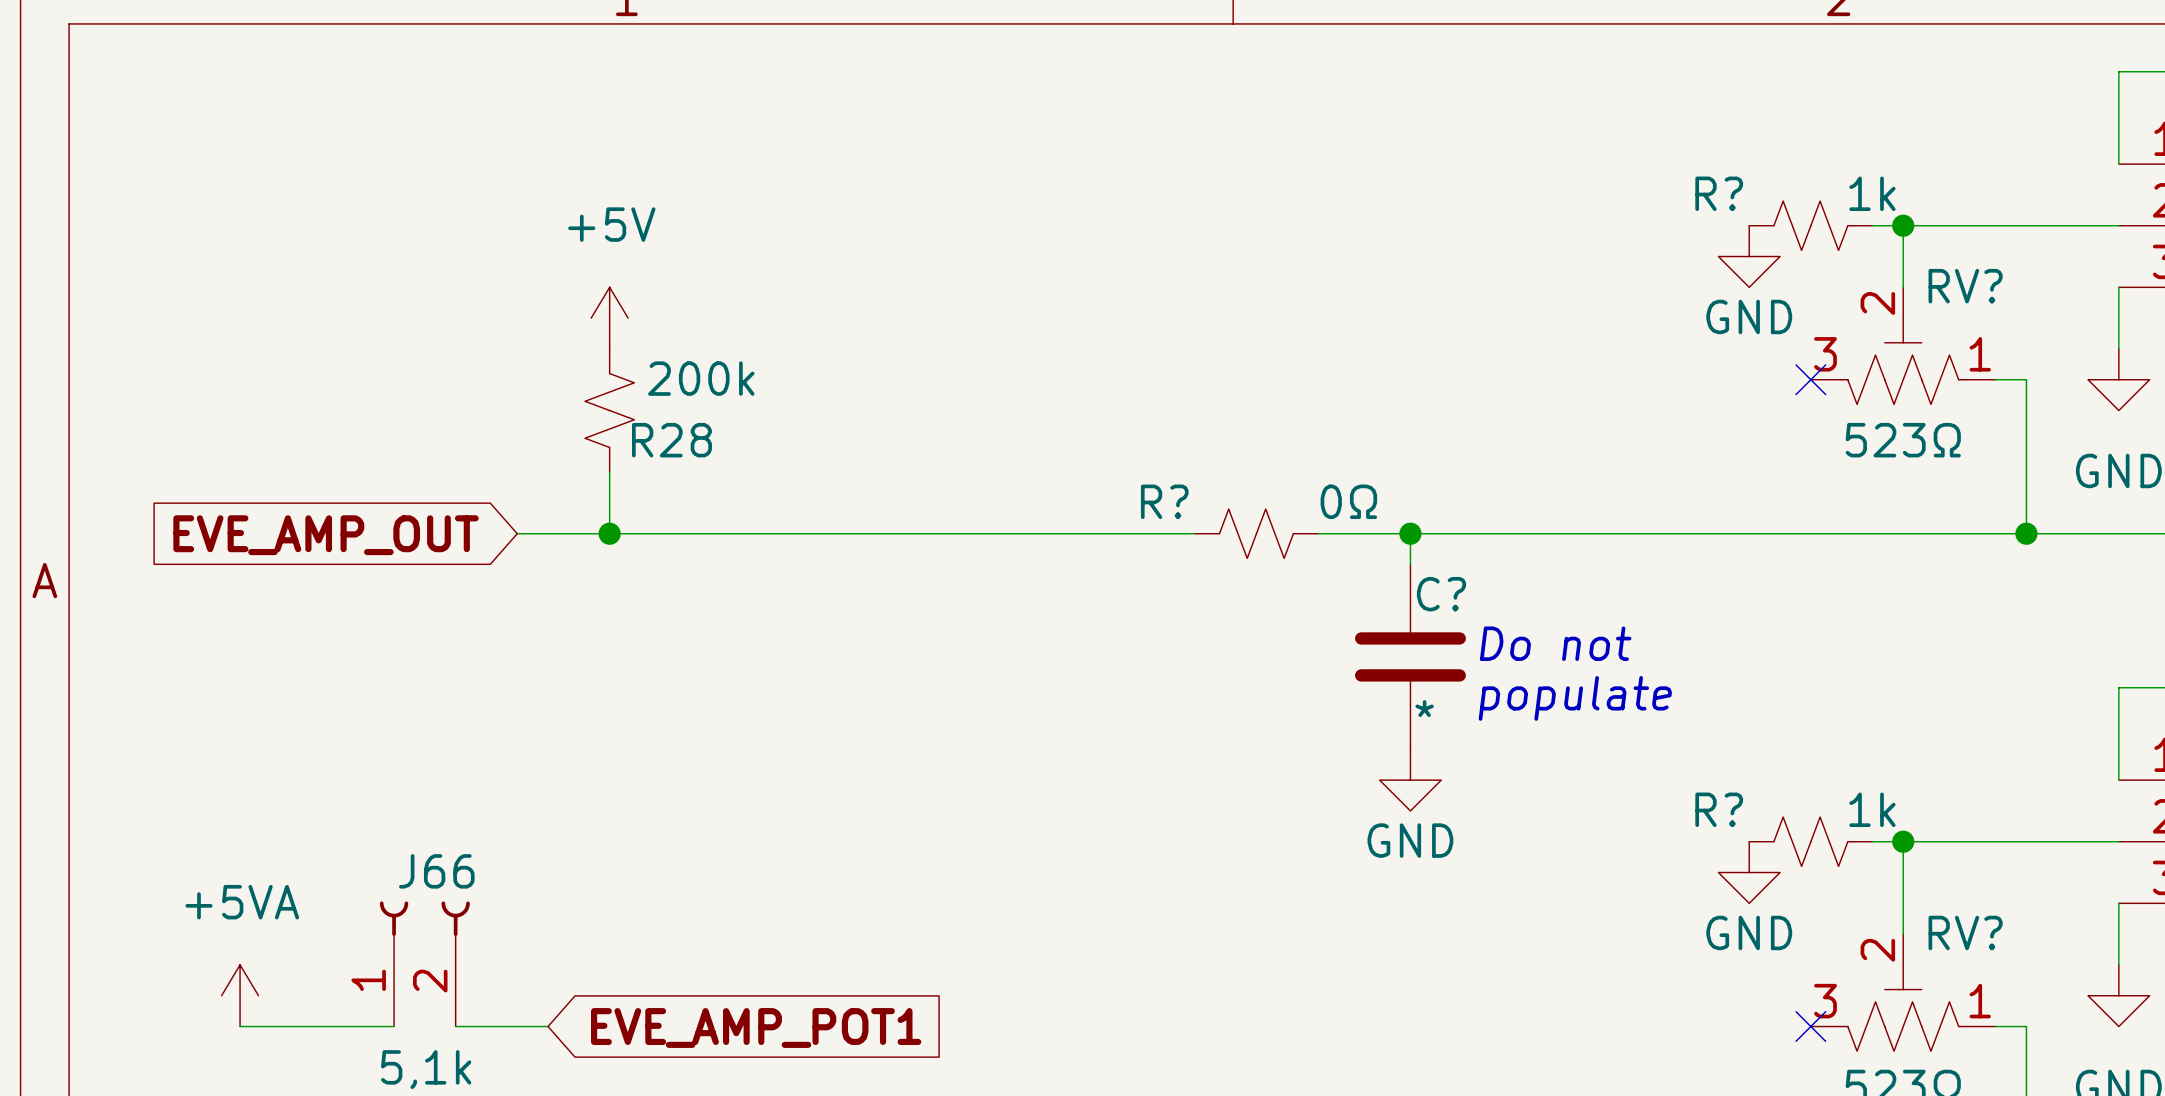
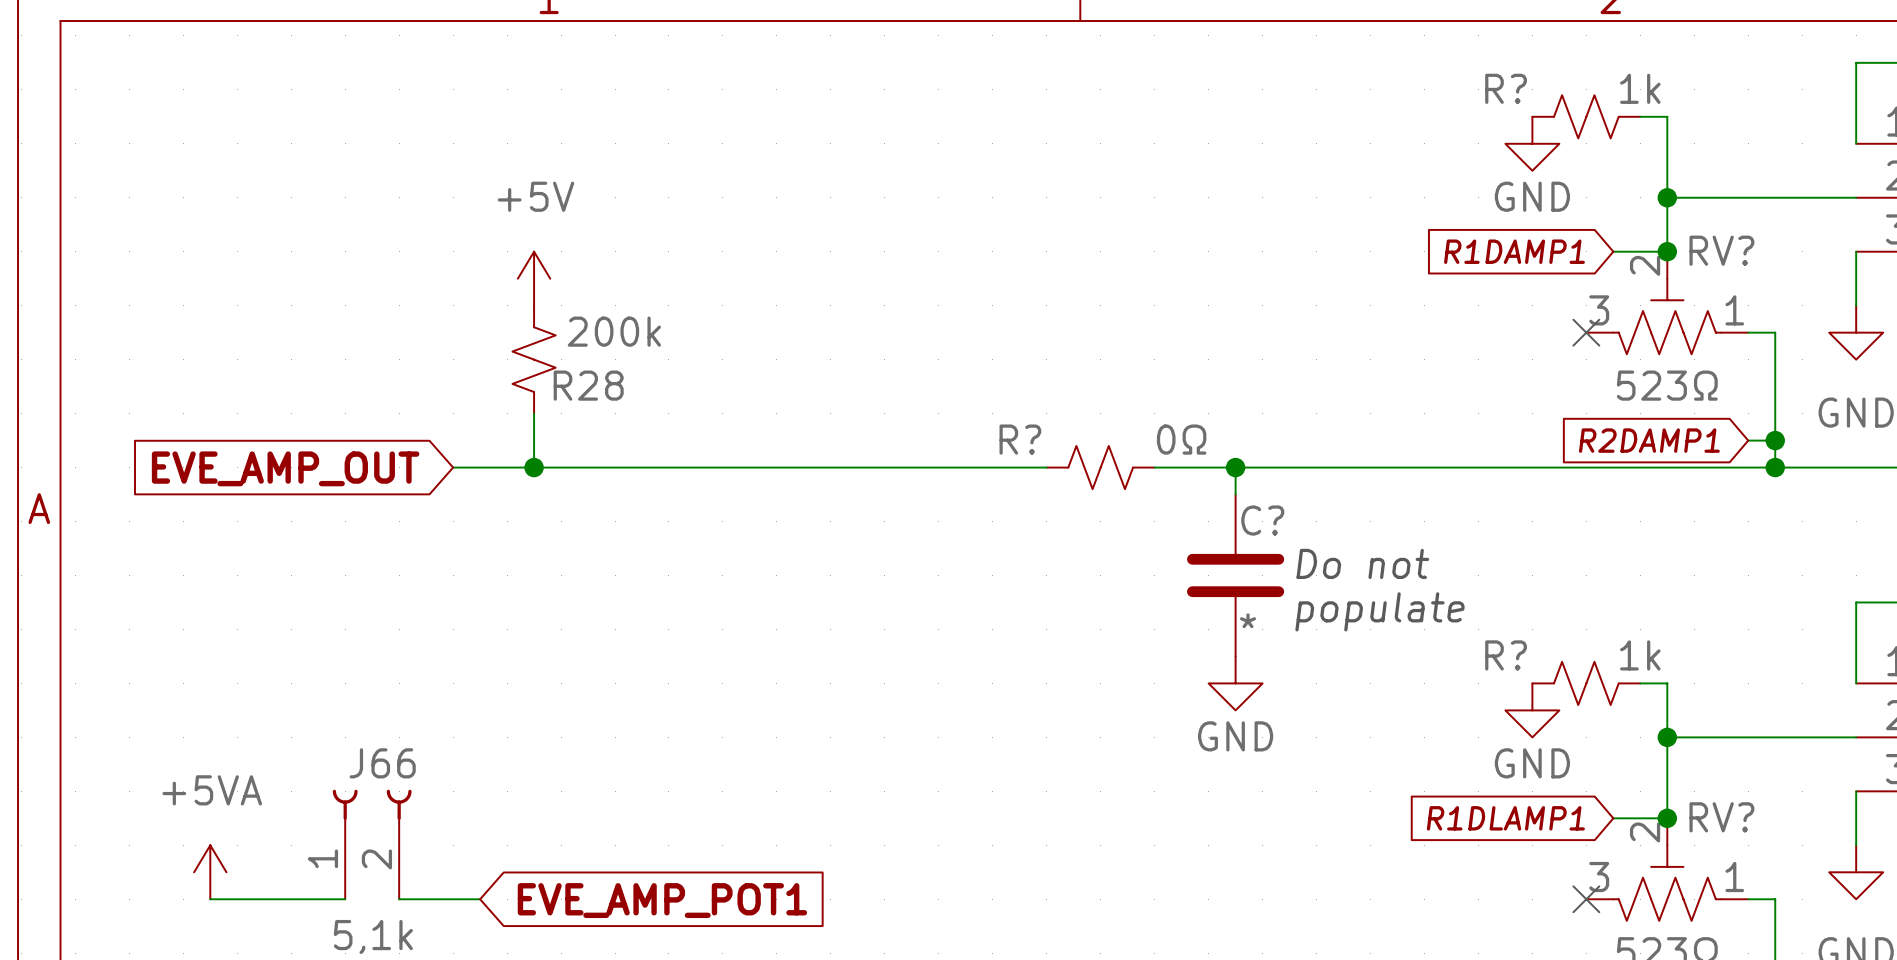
R? position: (1810, 225) -> (1586, 116)
wire: (1872, 225) (1903, 225) -> (1640, 116) (1667, 116) (1667, 197)
power symbol position: GND (1749, 256) -> GND (1532, 143)
global label: none -> R1DAMP1 (1514, 251)
wire: none -> (1613, 251) (1667, 251)
junction: none -> (1667, 251)
global label: none -> R2DAMP1 (1649, 440)
wire: none -> (1748, 440) (1775, 440)
junction: none -> (1775, 440)
R? position: (1810, 841) -> (1586, 683)
wire: (1872, 841) (1903, 841) -> (1640, 683) (1667, 683) (1667, 737)
power symbol position: GND (1749, 872) -> GND (1532, 710)
global label: none -> R1DLAMP1 (1505, 818)
wire: none -> (1613, 818) (1667, 818)
junction: none -> (1667, 818)

